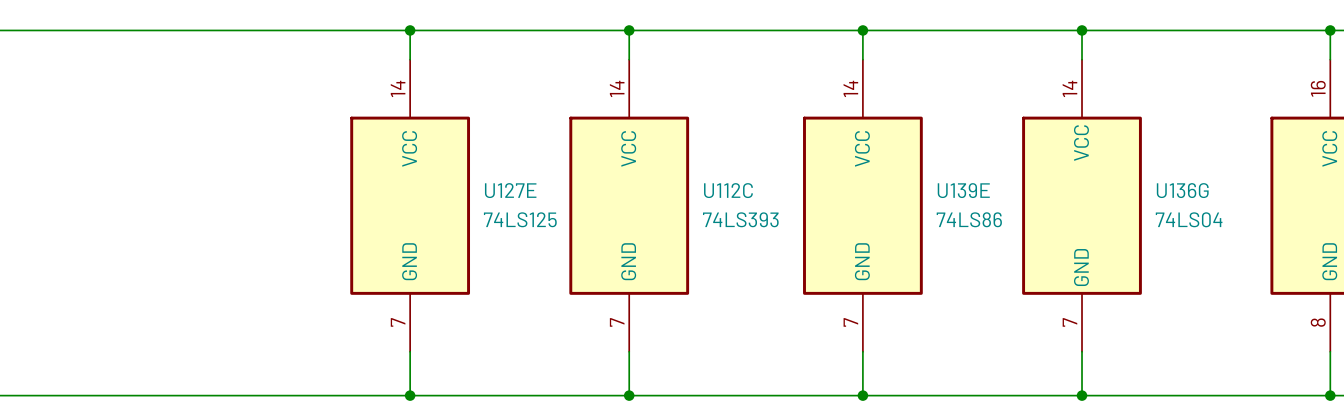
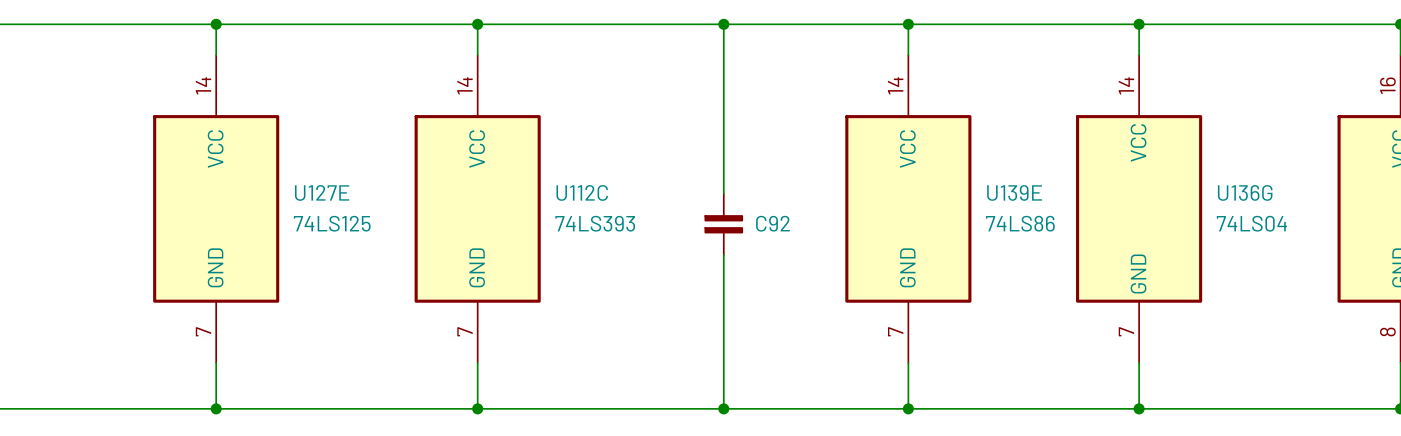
wire: none -> (216, 24) (216, 55)
junction: none -> (216, 24)
wire: (410, 30) (410, 59) -> (477, 24) (477, 55)
junction position: (410, 30) -> (477, 24)
wire: (629, 30) (629, 59) -> none
junction position: (629, 30) -> (723, 24)
wire: none -> (723, 24) (723, 193)
U127E position: (410, 205) -> (216, 208)
U112C position: (629, 205) -> (477, 208)
C92: none -> (723, 224)
wire: none -> (723, 255) (723, 408)
wire: none -> (216, 362) (216, 408)
wire: (410, 351) (410, 395) -> (477, 362) (477, 408)
wire: (629, 351) (629, 395) -> none
junction: none -> (216, 408)
junction position: (410, 395) -> (477, 408)
junction position: (629, 395) -> (723, 408)

